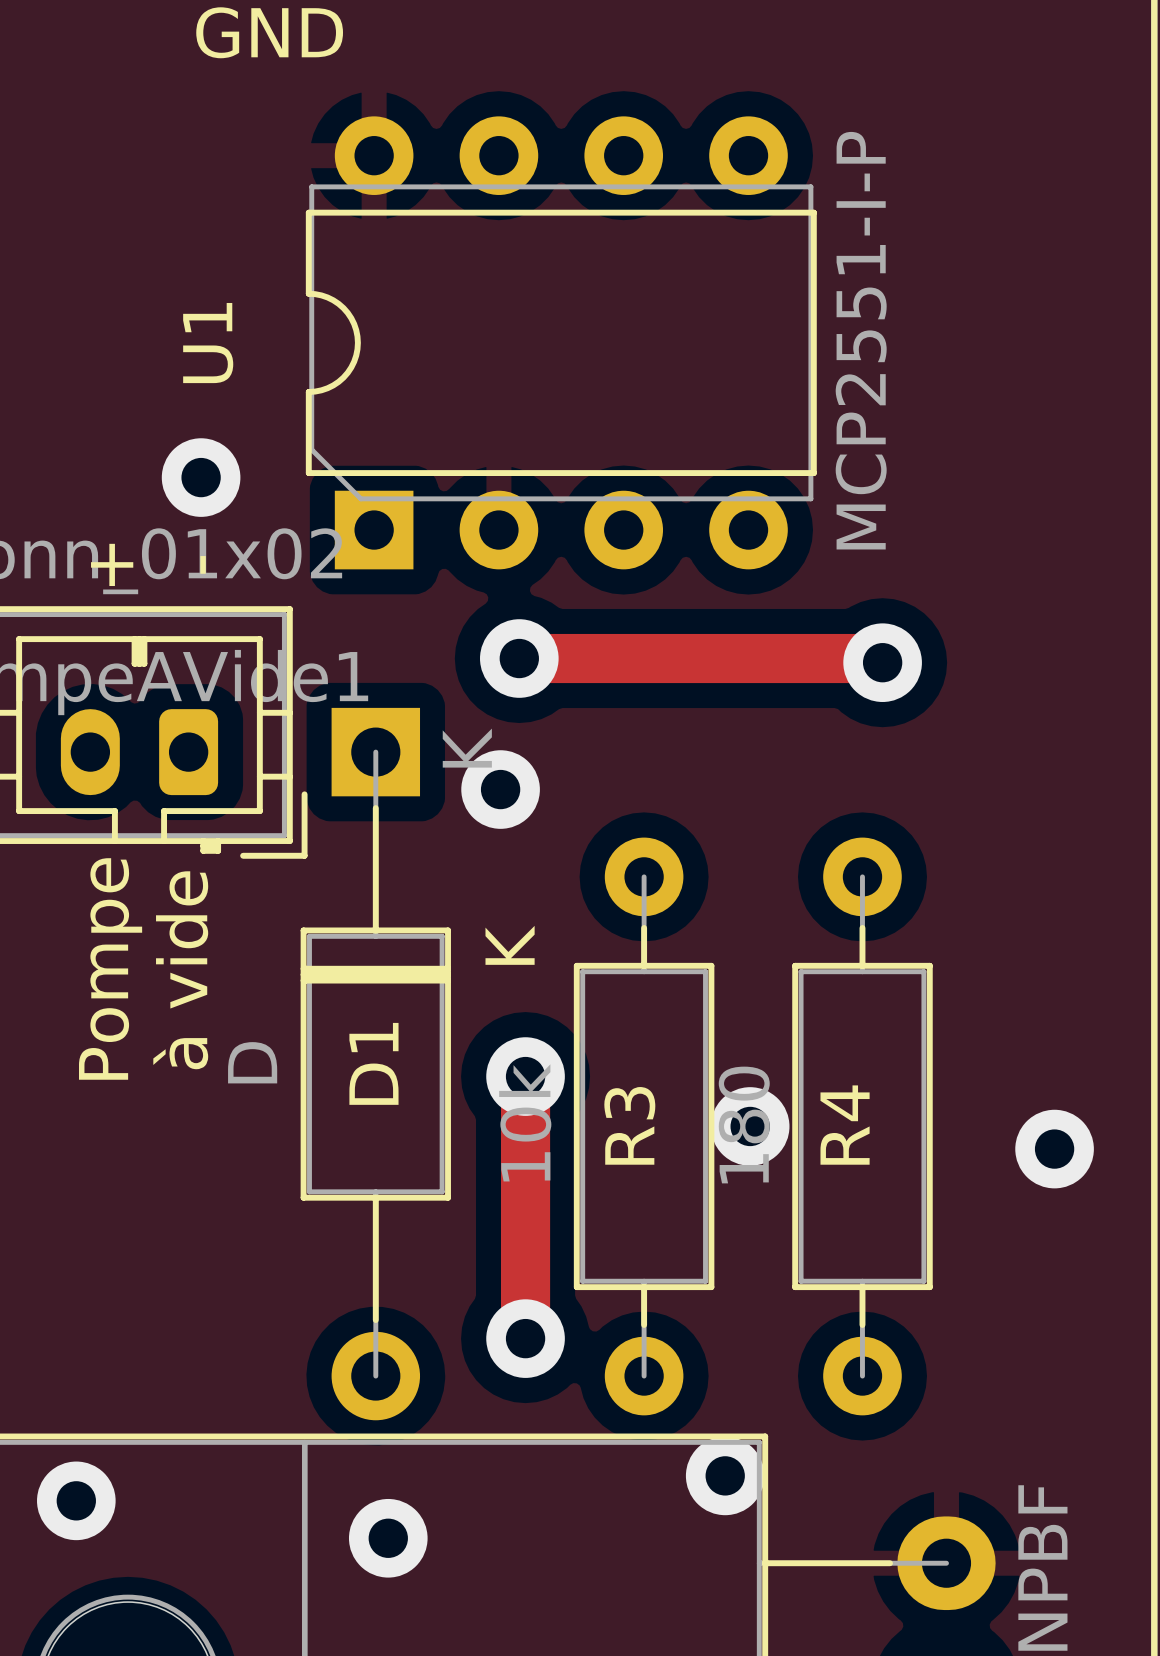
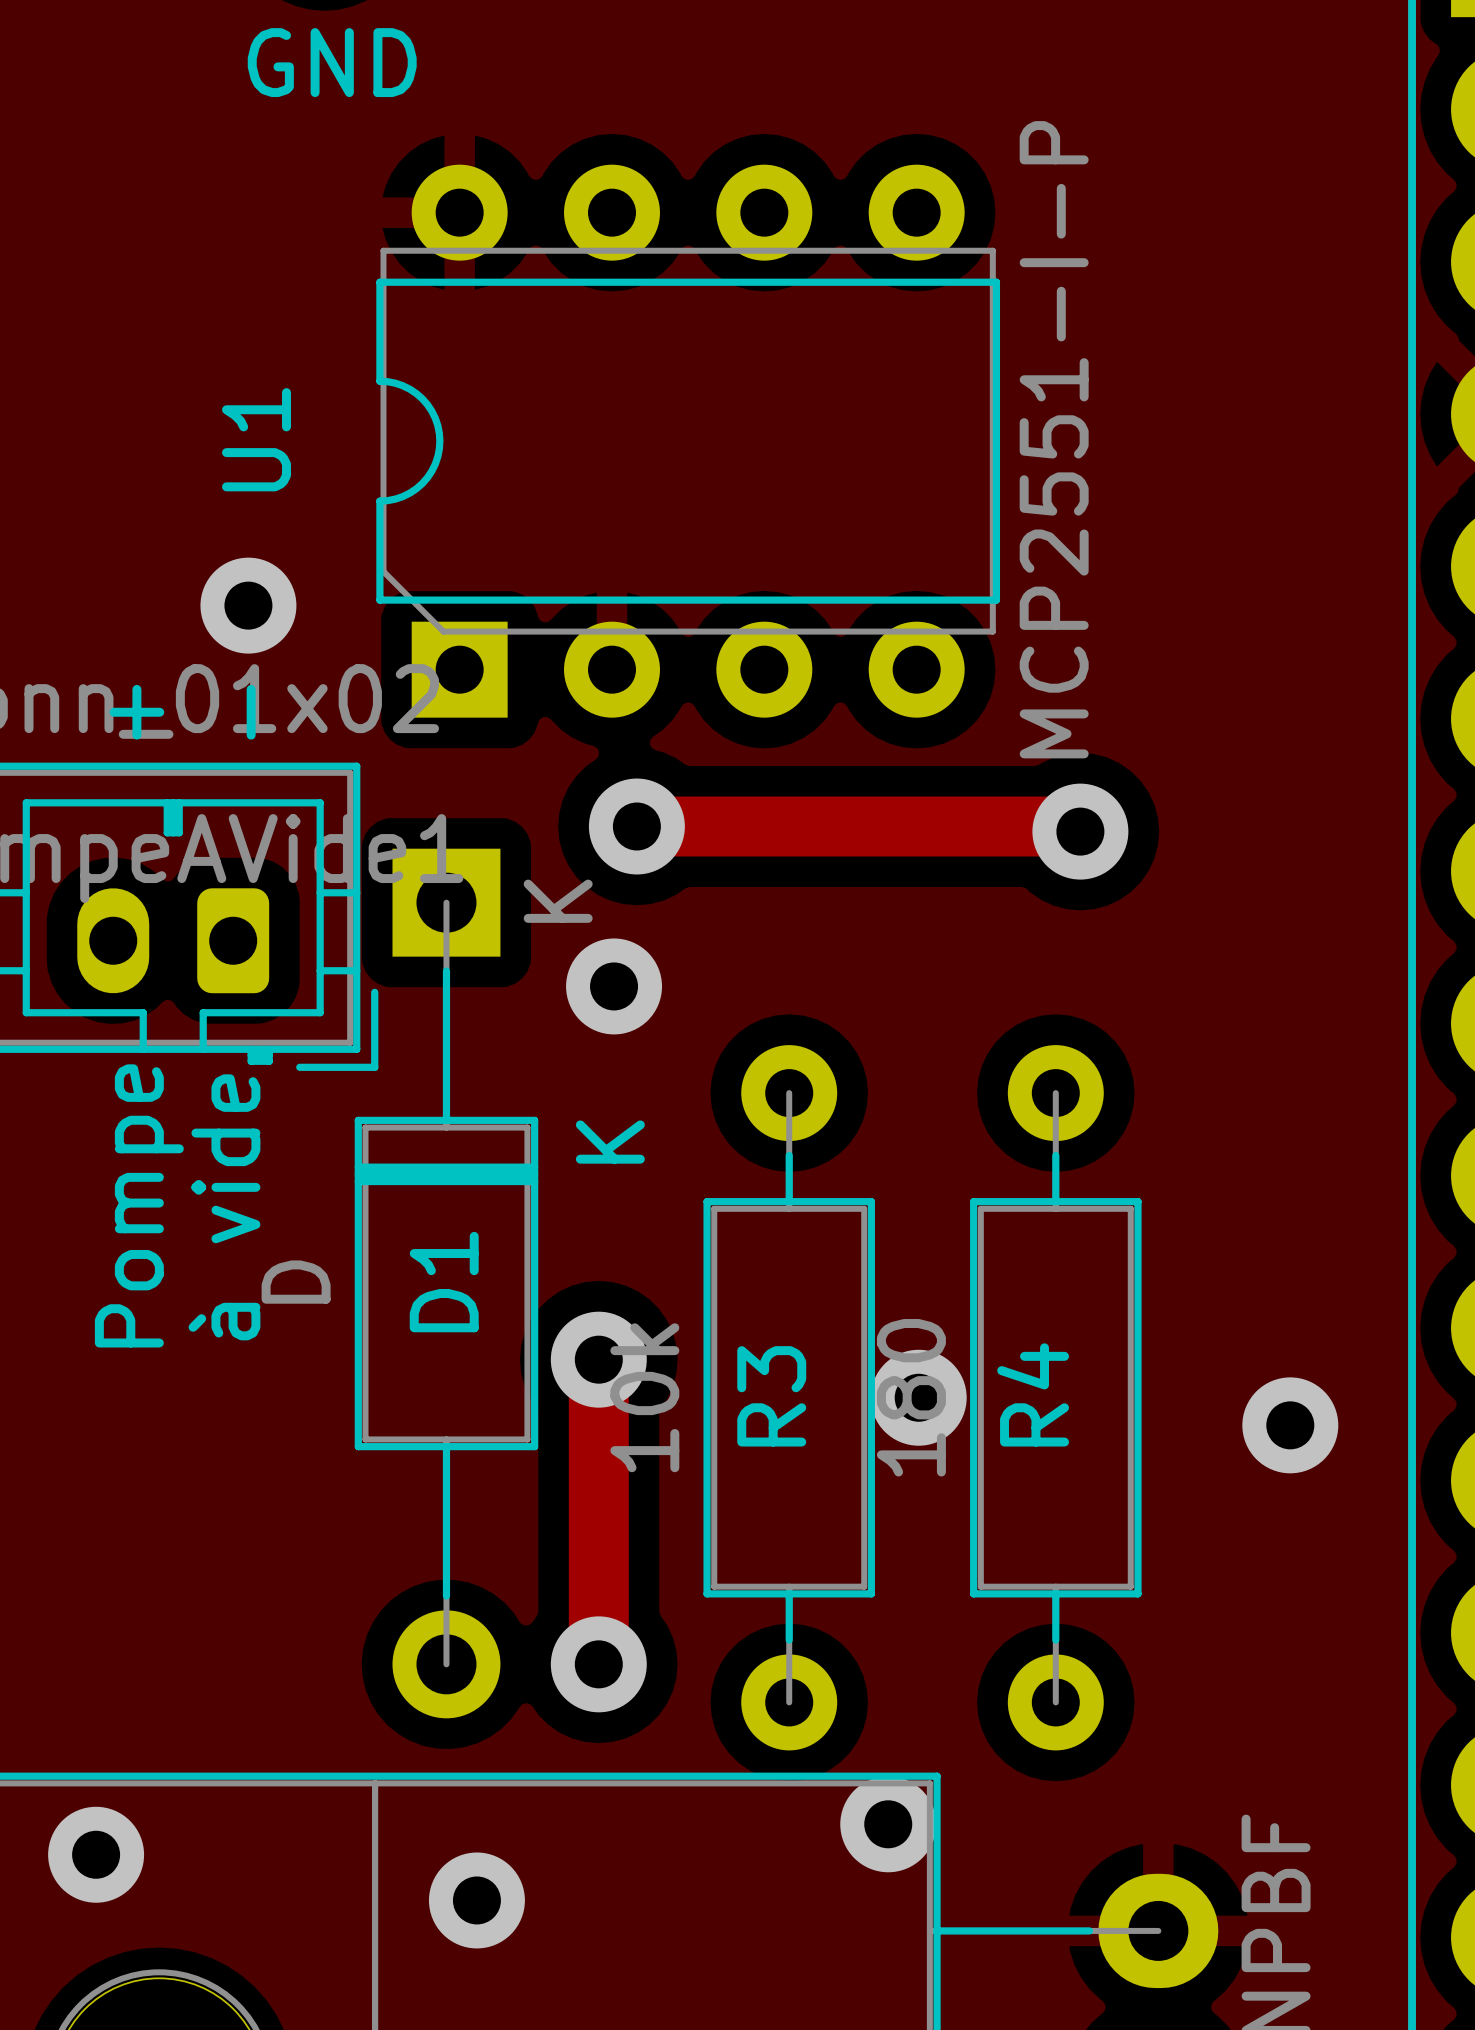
D1 position: (375, 1064) -> (446, 1283)
track: (525, 1076) (525, 1338) -> none
via position: (525, 1076) -> (598, 1359)
track: none -> (598, 1359) (598, 1664)
via position: (525, 1338) -> (598, 1664)

